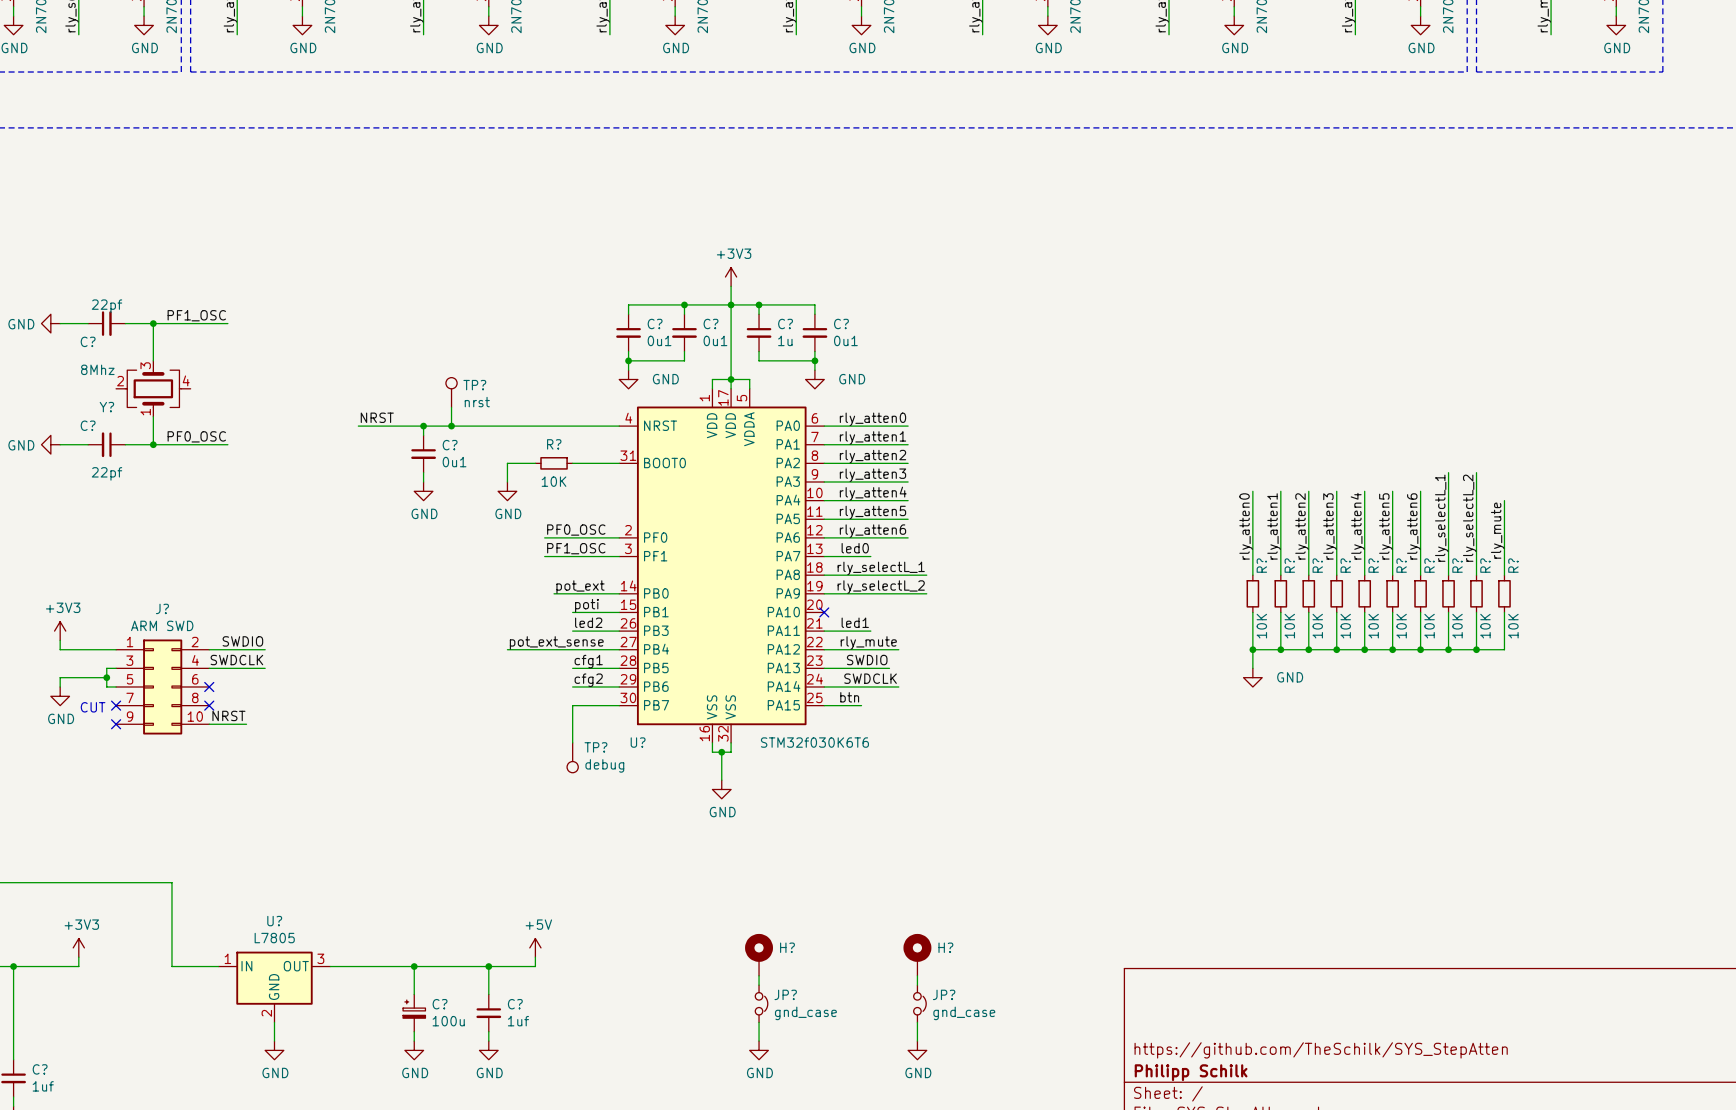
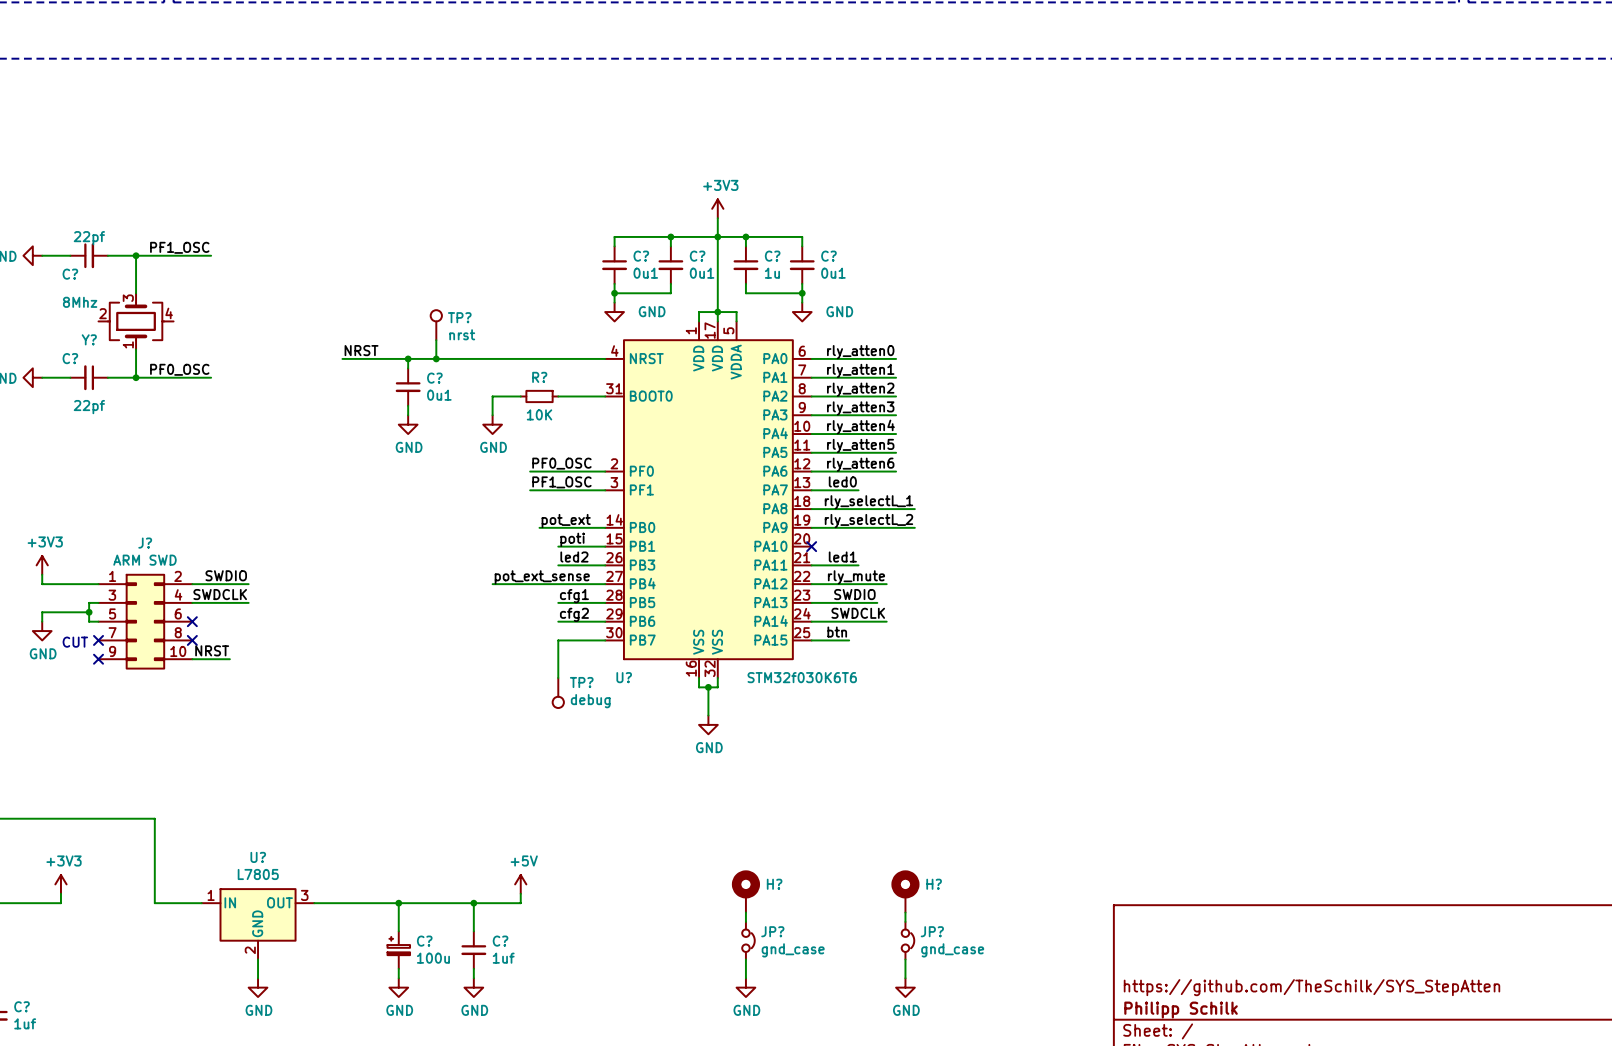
wire: (1448, 472) (1448, 575) -> none
wire: (1476, 472) (1476, 575) -> none
wire: (1252, 491) (1252, 575) -> none
wire: (1280, 491) (1280, 575) -> none
wire: (1308, 491) (1308, 575) -> none
wire: (1336, 491) (1336, 575) -> none
wire: (1364, 491) (1364, 575) -> none
wire: (1392, 491) (1392, 575) -> none
wire: (1420, 491) (1420, 575) -> none
wire: (1504, 500) (1504, 575) -> none
label: rly_selectL_1 (1441, 518) -> none
label: rly_selectL_2 (1469, 518) -> none
label: rly_atten0 (1246, 526) -> none
label: rly_atten1 (1274, 526) -> none
label: rly_atten2 (1302, 526) -> none
label: rly_atten3 (1329, 526) -> none
label: rly_atten4 (1357, 526) -> none
label: rly_atten5 (1385, 526) -> none
label: rly_atten6 (1413, 526) -> none
label: rly_mute (1497, 530) -> none
R?: 10K (1252, 593) -> none
R?: 10K (1280, 593) -> none
R?: 10K (1308, 593) -> none
R?: 10K (1336, 593) -> none
R?: 10K (1364, 593) -> none
R?: 10K (1392, 593) -> none
R?: 10K (1420, 593) -> none
R?: 10K (1448, 593) -> none
R?: 10K (1476, 593) -> none
R?: 10K (1504, 593) -> none
wire: (1252, 612) (1252, 668) -> none
wire: (1280, 612) (1280, 649) -> none
wire: (1308, 612) (1308, 649) -> none
wire: (1336, 612) (1336, 649) -> none
wire: (1364, 612) (1364, 649) -> none
wire: (1392, 612) (1392, 649) -> none
wire: (1420, 612) (1420, 649) -> none
wire: (1448, 612) (1448, 649) -> none
wire: (1476, 612) (1476, 649) -> none
wire: (1504, 612) (1504, 649) (1252, 649) -> none
junction: (1252, 649) -> none
junction: (1280, 649) -> none
junction: (1308, 649) -> none
junction: (1336, 649) -> none
junction: (1364, 649) -> none
junction: (1392, 649) -> none
junction: (1420, 649) -> none
junction: (1448, 649) -> none
junction: (1476, 649) -> none
power symbol: GND (1252, 677) -> none

